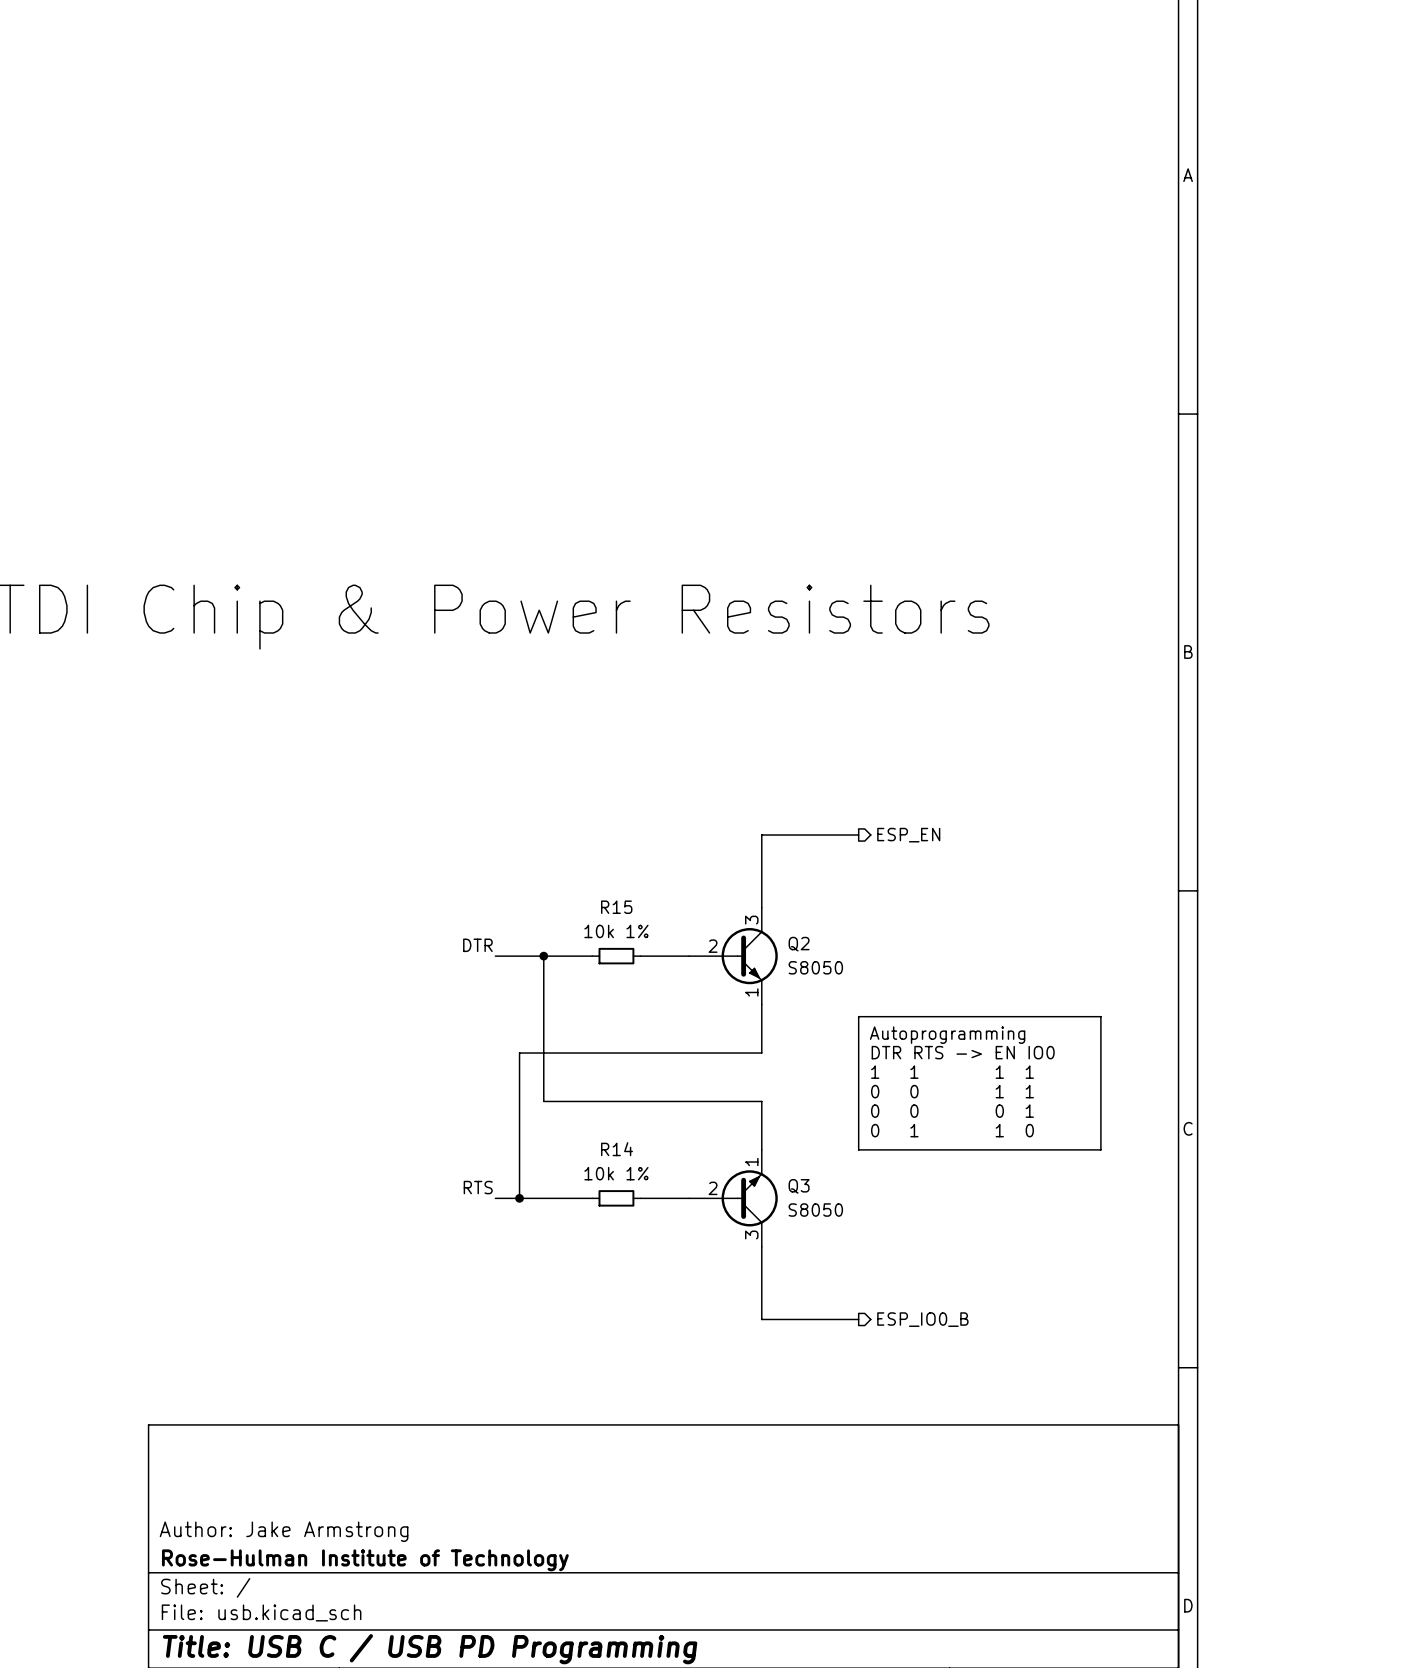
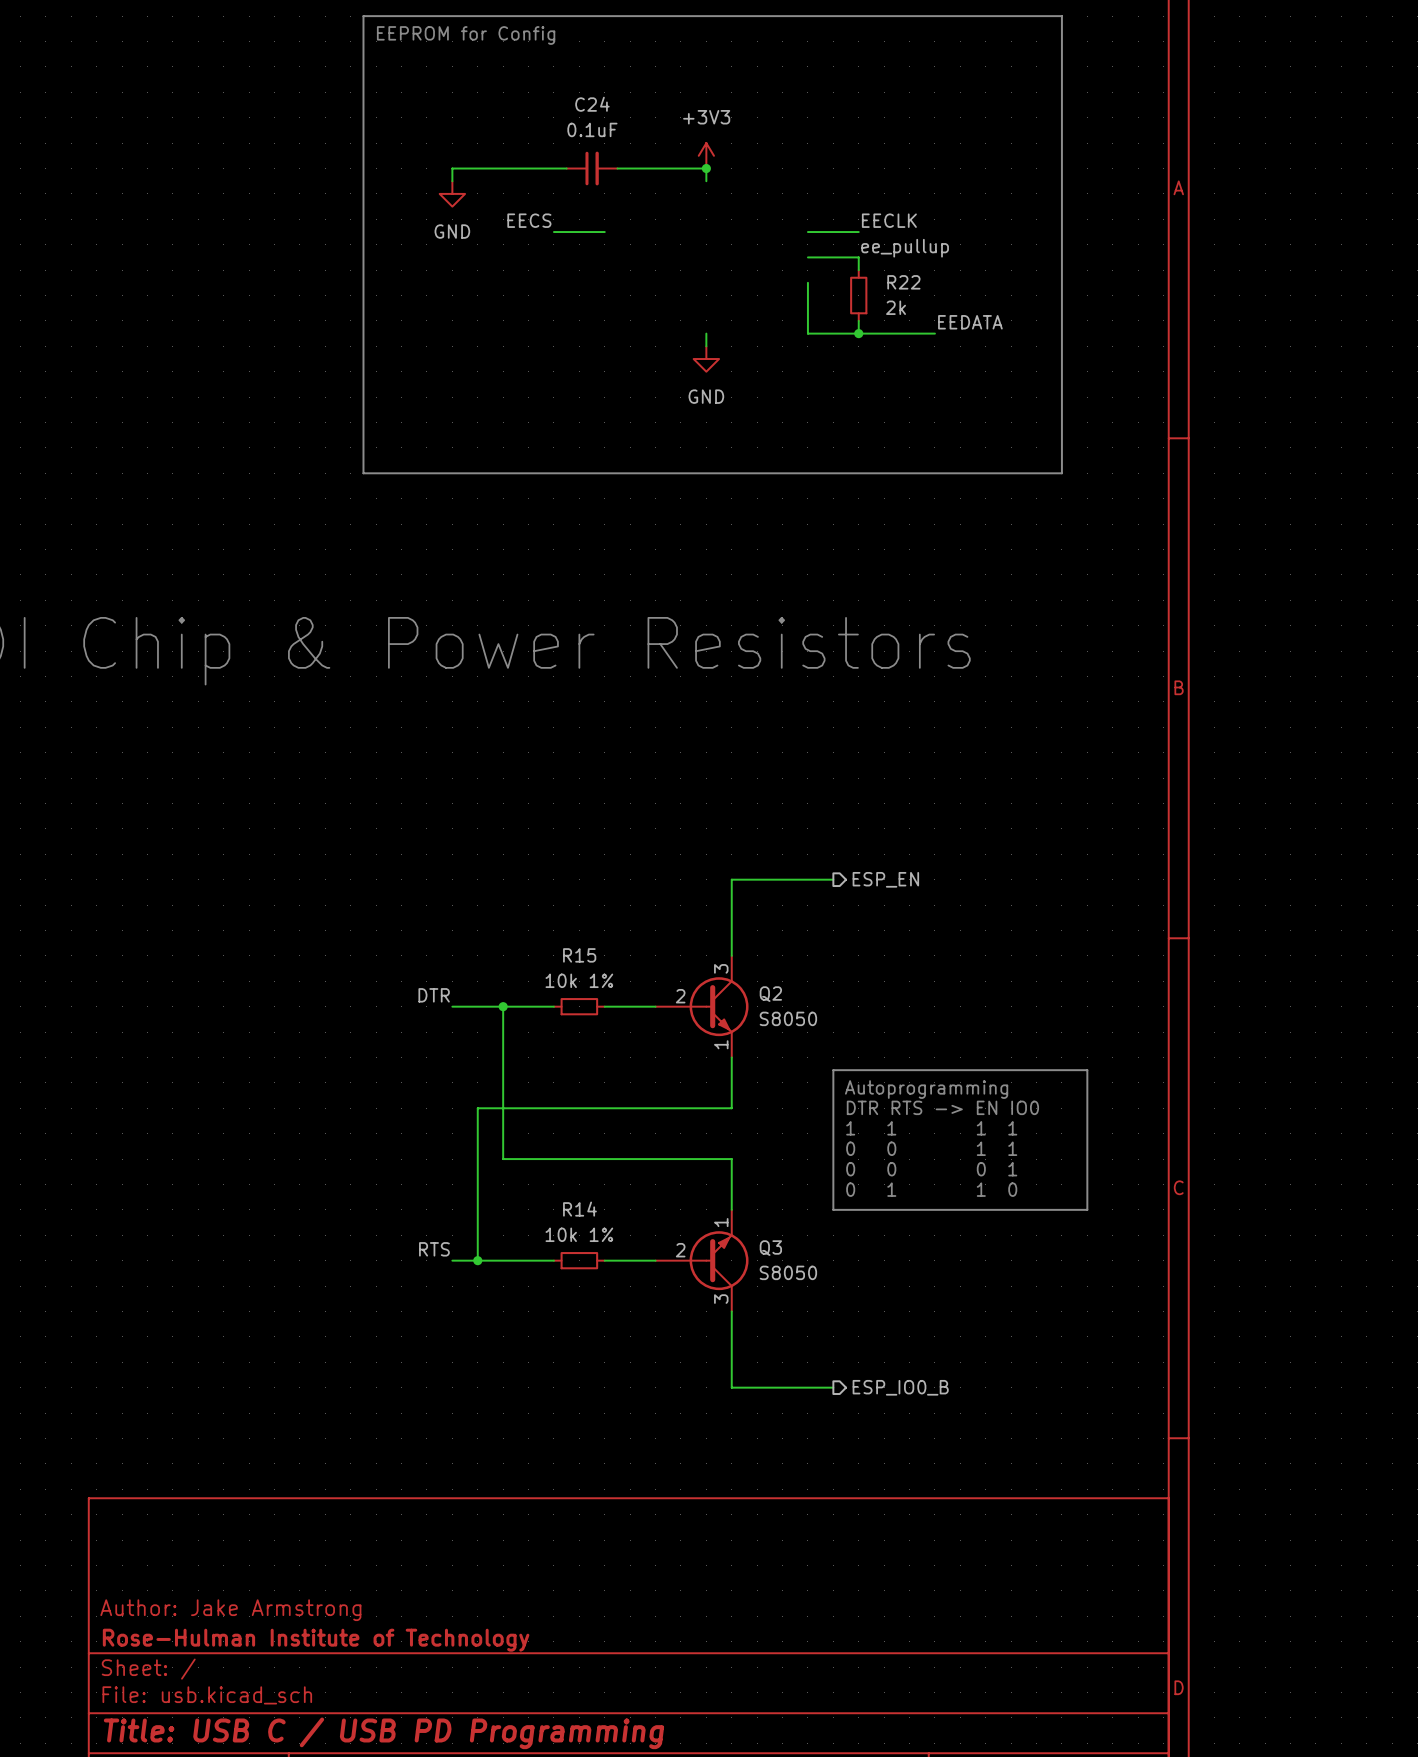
line: none -> (363, 16) (1061, 16) (1061, 473) (363, 473) (363, 16)
text: none -> EEPROM for Config (466, 35)
power symbol: none -> +3V3 (706, 155)
wire: none -> (566, 168) (452, 168) (452, 181)
C24: none -> 0.1uF (592, 168)
wire: none -> (617, 168) (706, 168) (706, 181)
junction: none -> (706, 168)
power symbol: none -> GND (452, 193)
label: none -> EECS (529, 220)
label: none -> EECLK (889, 220)
wire: none -> (553, 232) (604, 232)
wire: none -> (807, 232) (858, 232)
label: none -> ee_pullup (905, 248)
wire: none -> (807, 257) (858, 257) (858, 270)
wire: none -> (807, 282) (807, 333) (934, 333)
R22: none -> 2k (858, 295)
wire: none -> (858, 320) (858, 333)
label: none -> EEDATA (970, 322)
wire: none -> (706, 333) (706, 346)
junction: none -> (858, 333)
power symbol: none -> GND (706, 359)

